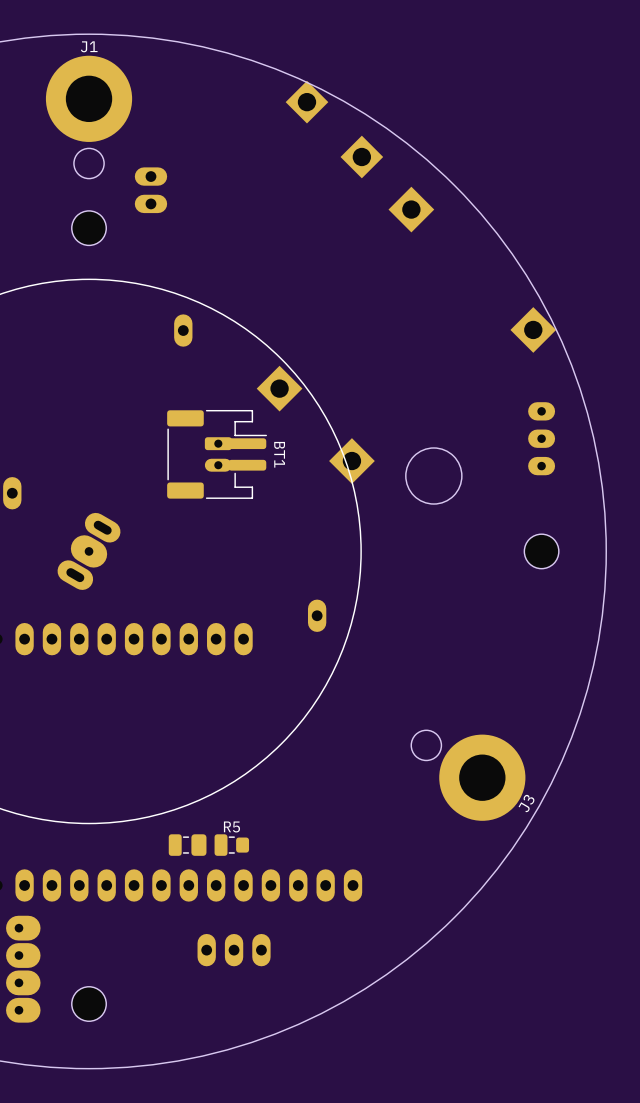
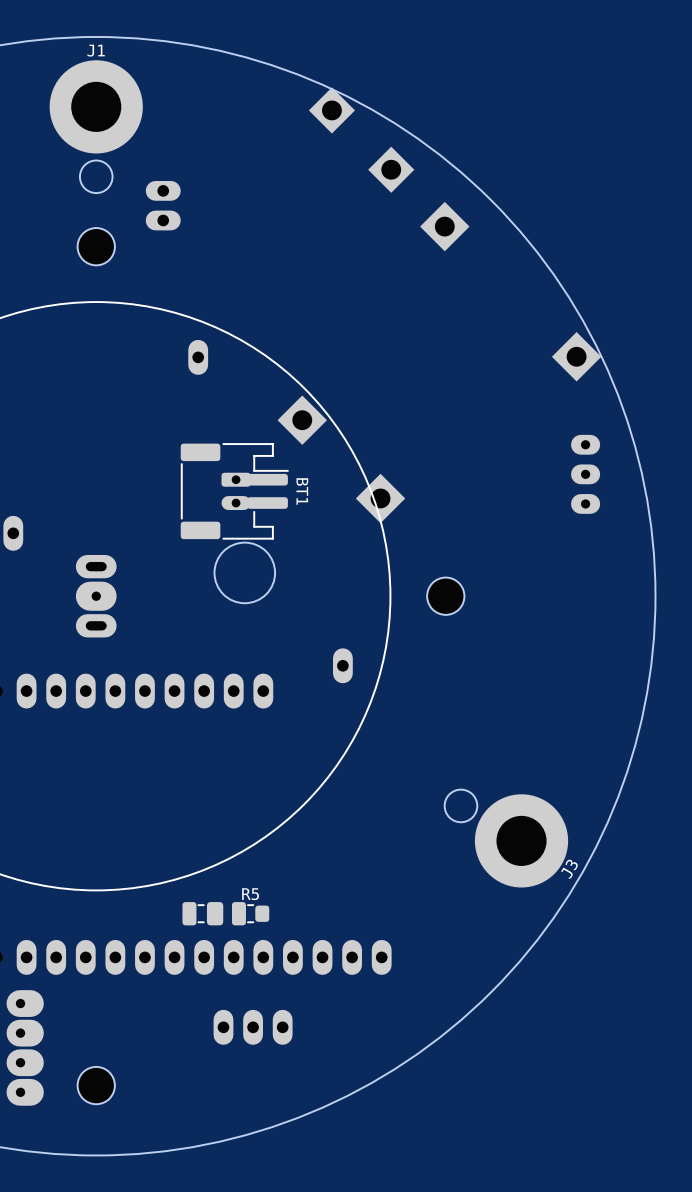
round board edge position: (433, 476) -> (244, 572)
part rotation: 0° (89, 551) -> 30° counterclockwise (96, 596)
part position: (541, 551) -> (445, 596)

